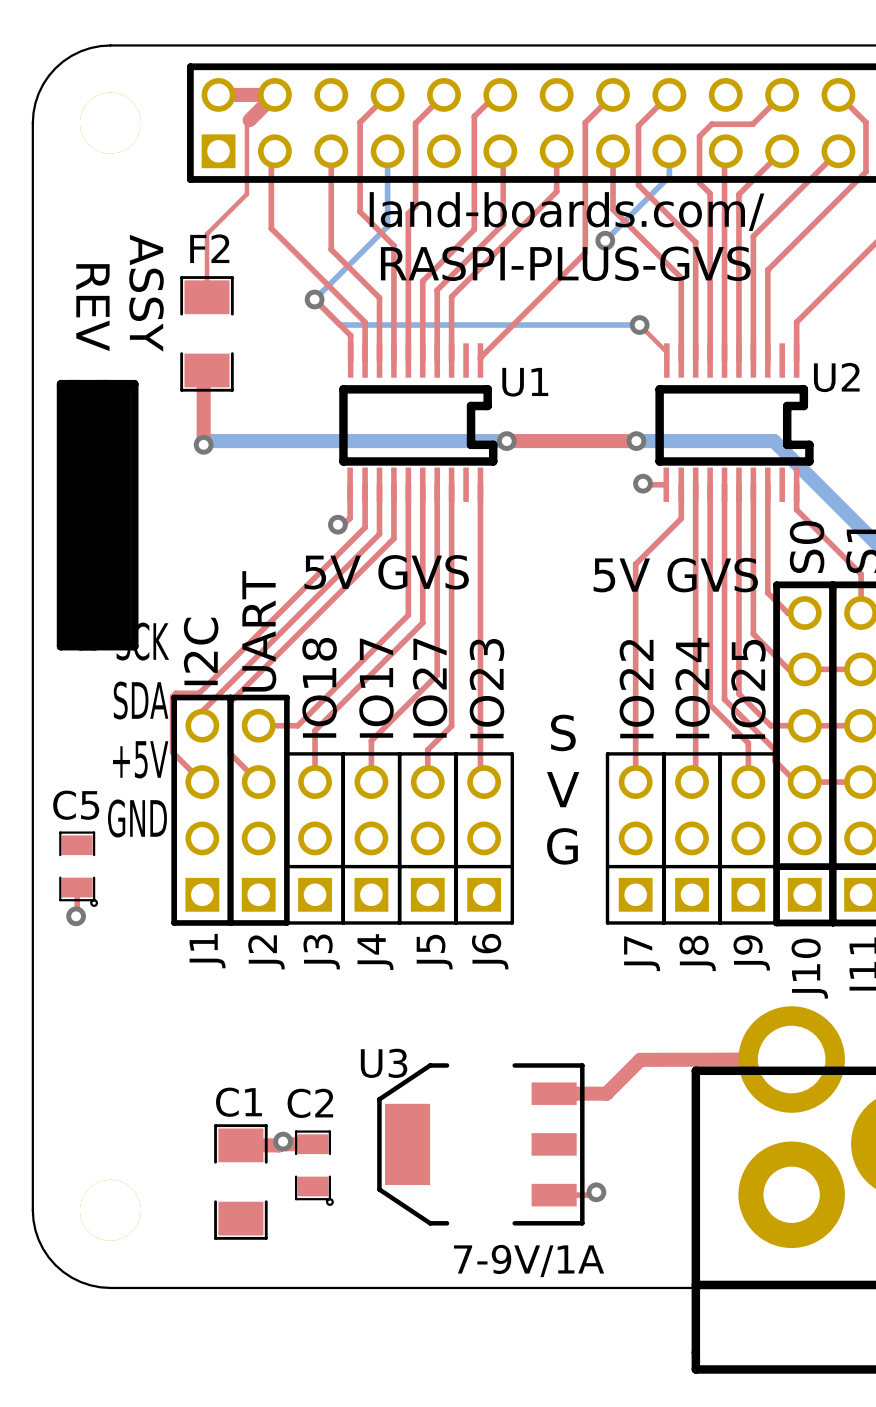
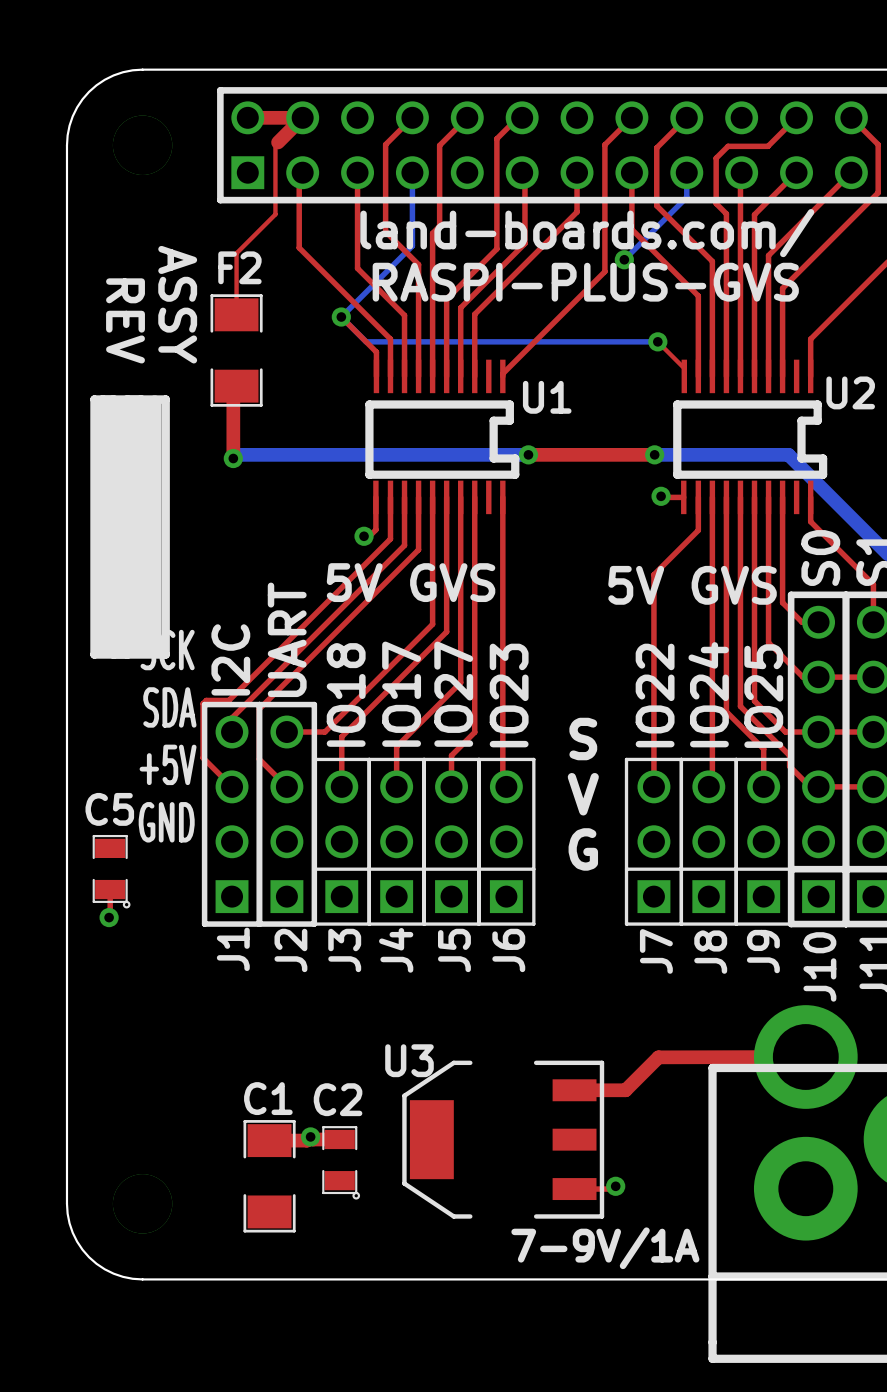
text position: 7-9V/1A (529, 1260) -> 7-9V/1A (605, 1248)

